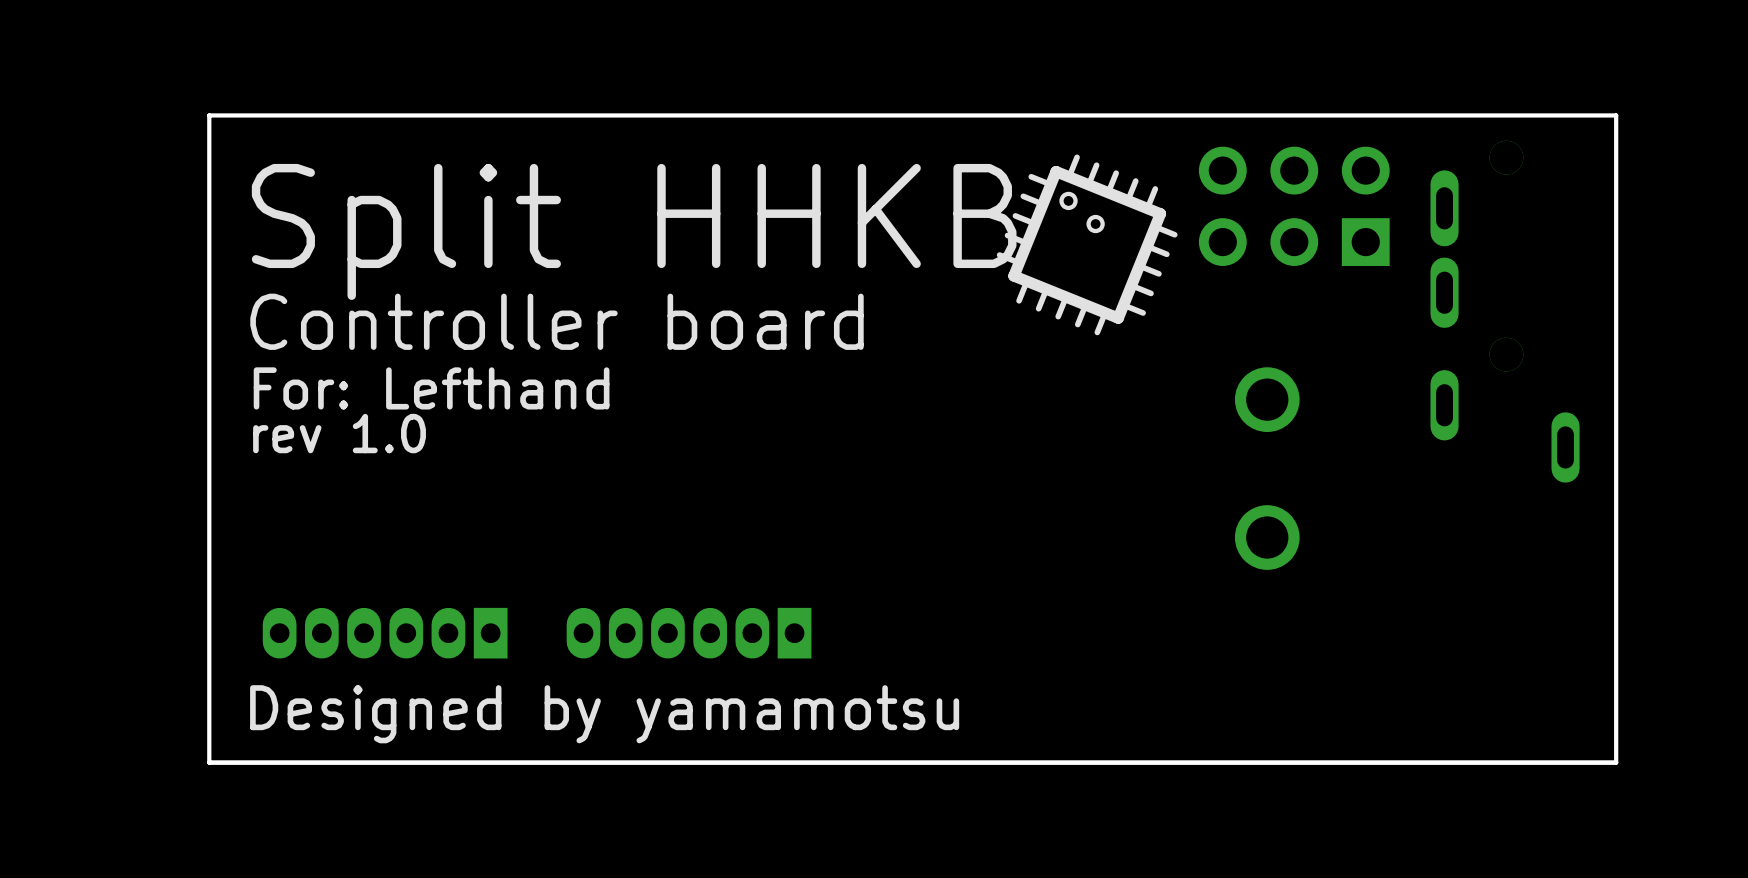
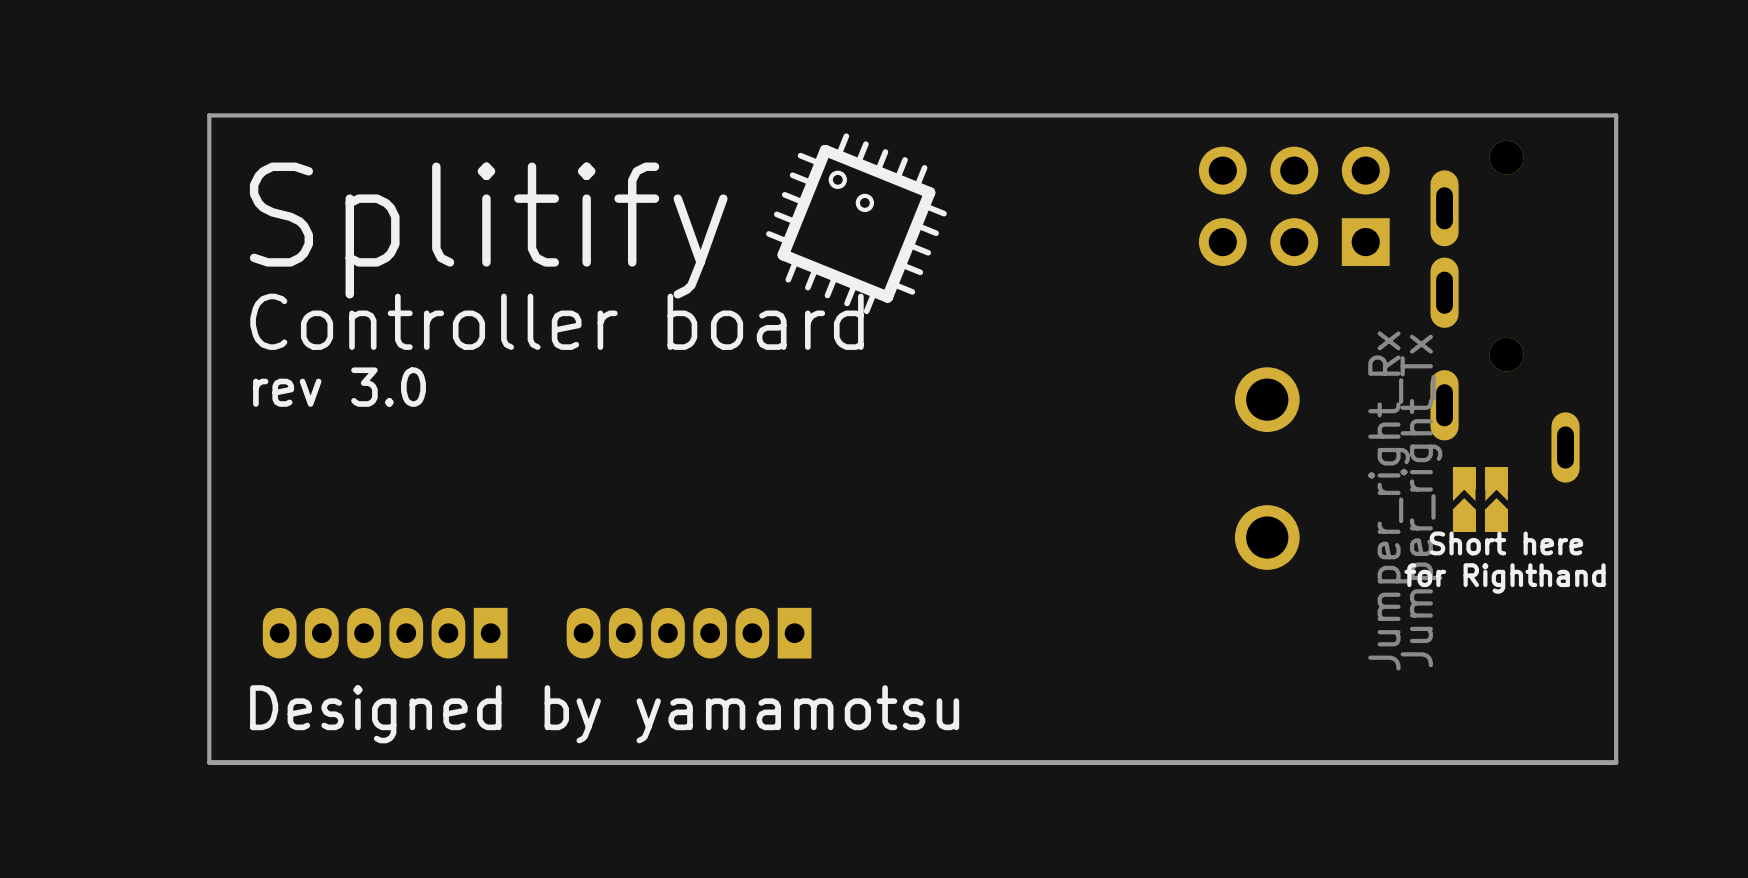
text: none -> Splitify (488, 230)
text: Split HHKB (634, 231) -> none
drawing position: (1087, 244) -> (856, 223)
text: For: Lefthand (431, 388) -> none
text: rev 1.0 (339, 433) -> rev 3.0 (339, 387)
part: none -> Jumper_right_Rx (1464, 499)
part: none -> Jumper_right_Tx (1496, 499)
text: none -> Short here (1506, 543)
text: none -> for Righthand (1505, 578)

